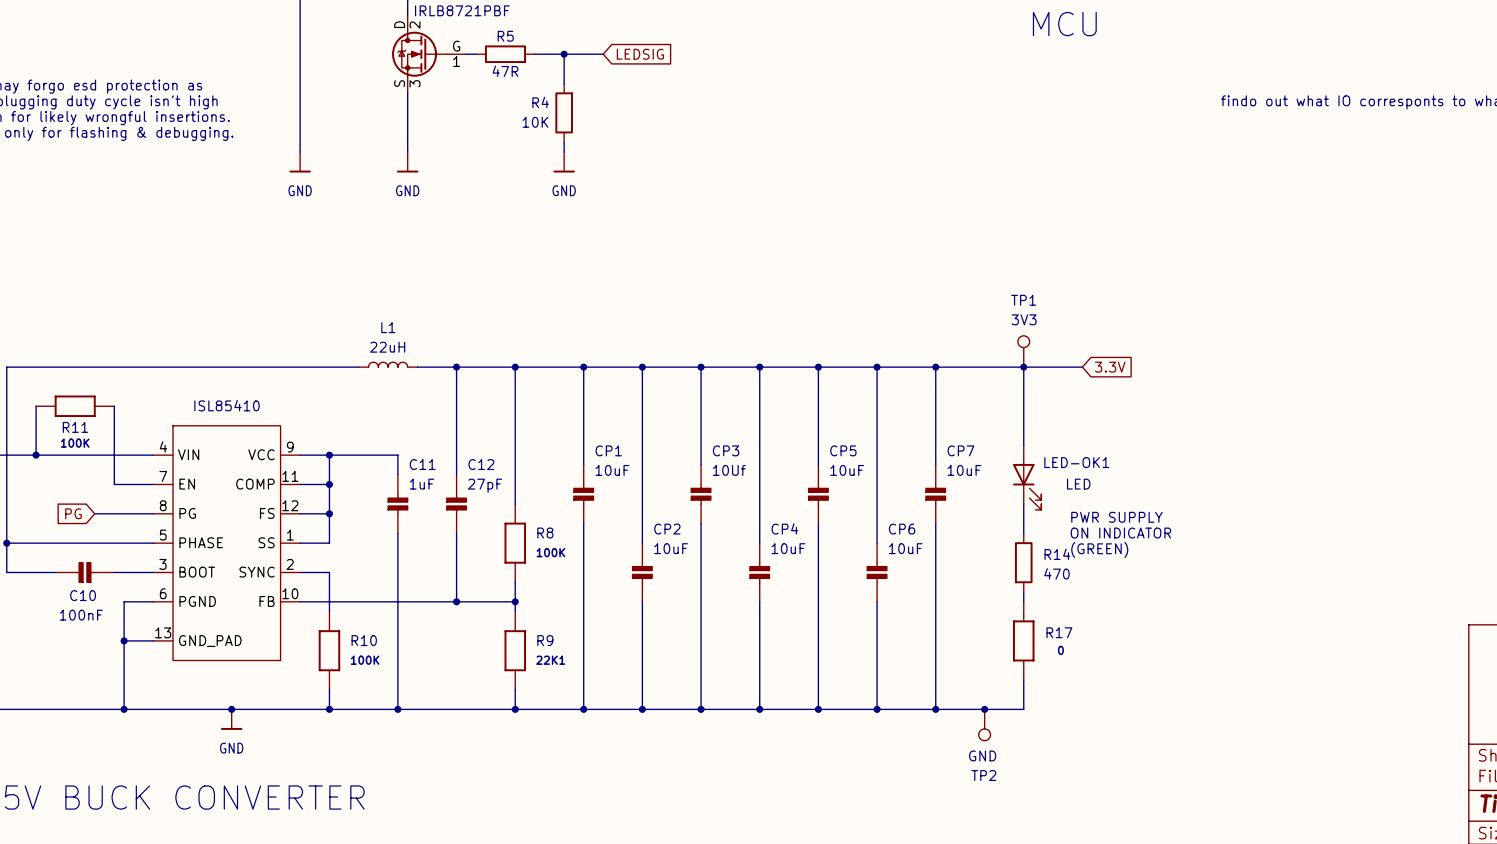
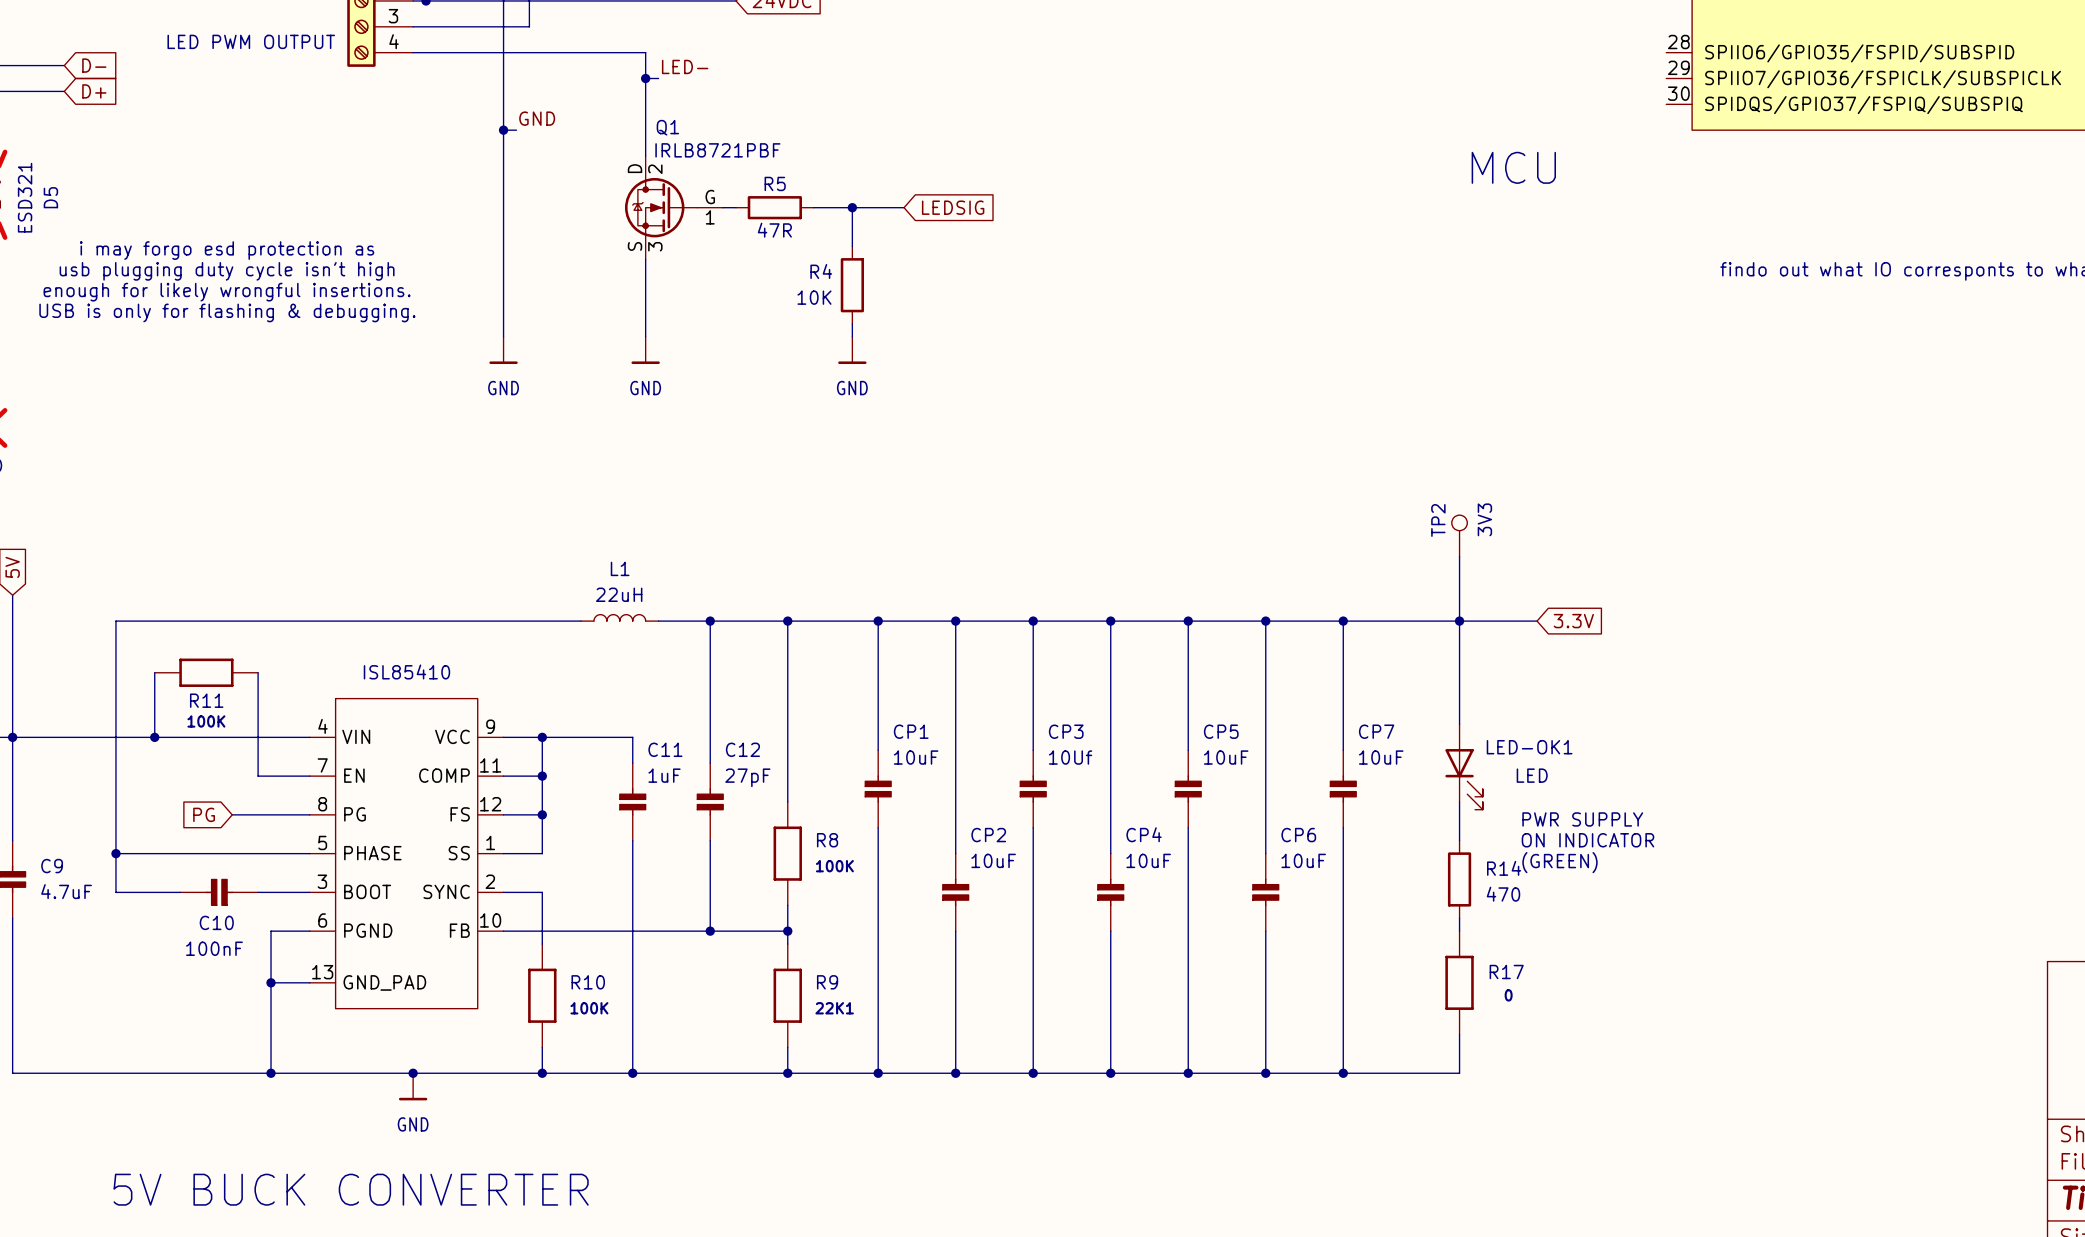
wire: none -> (1459, 556) (1459, 621)
TP1: 3V3 (1023, 351) -> none
junction: (984, 709) -> none
TP2 position: (984, 725) -> (1459, 535)
TP2 rotation: 0° (984, 734) -> 180° (1459, 522)
TP2 value: GND (982, 755) -> 3V3 (1484, 519)
TP2 name position: TP2 (983, 775) -> TP2 (1438, 520)

